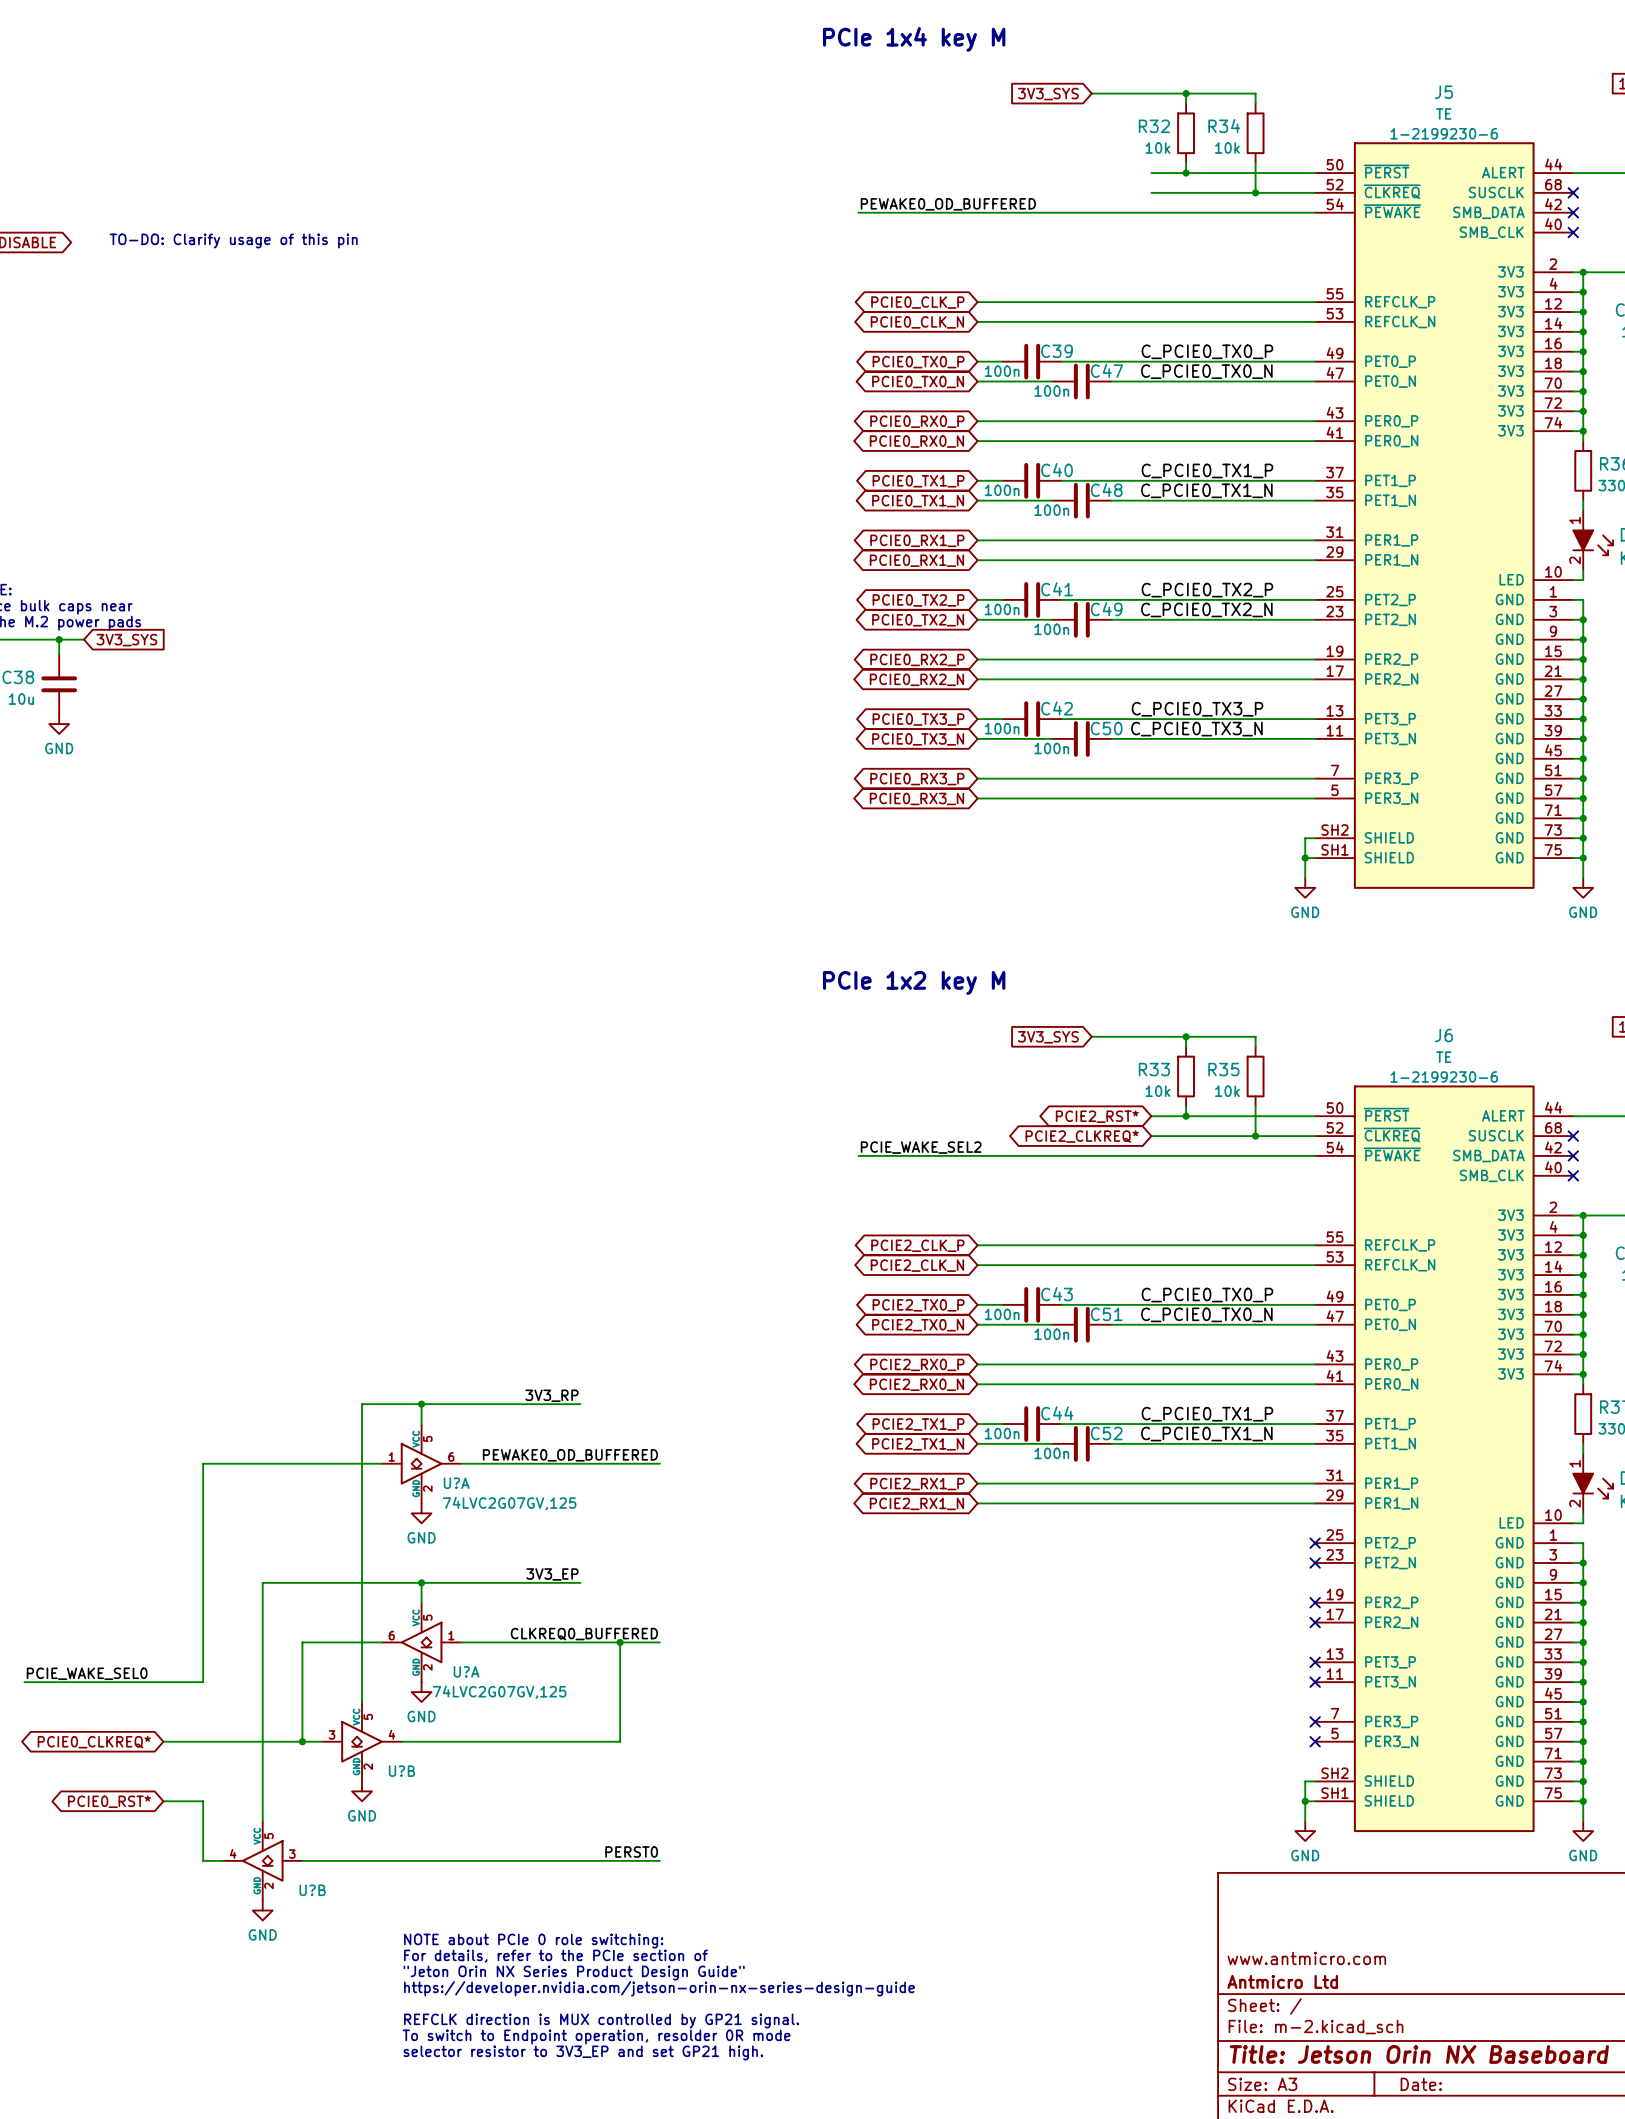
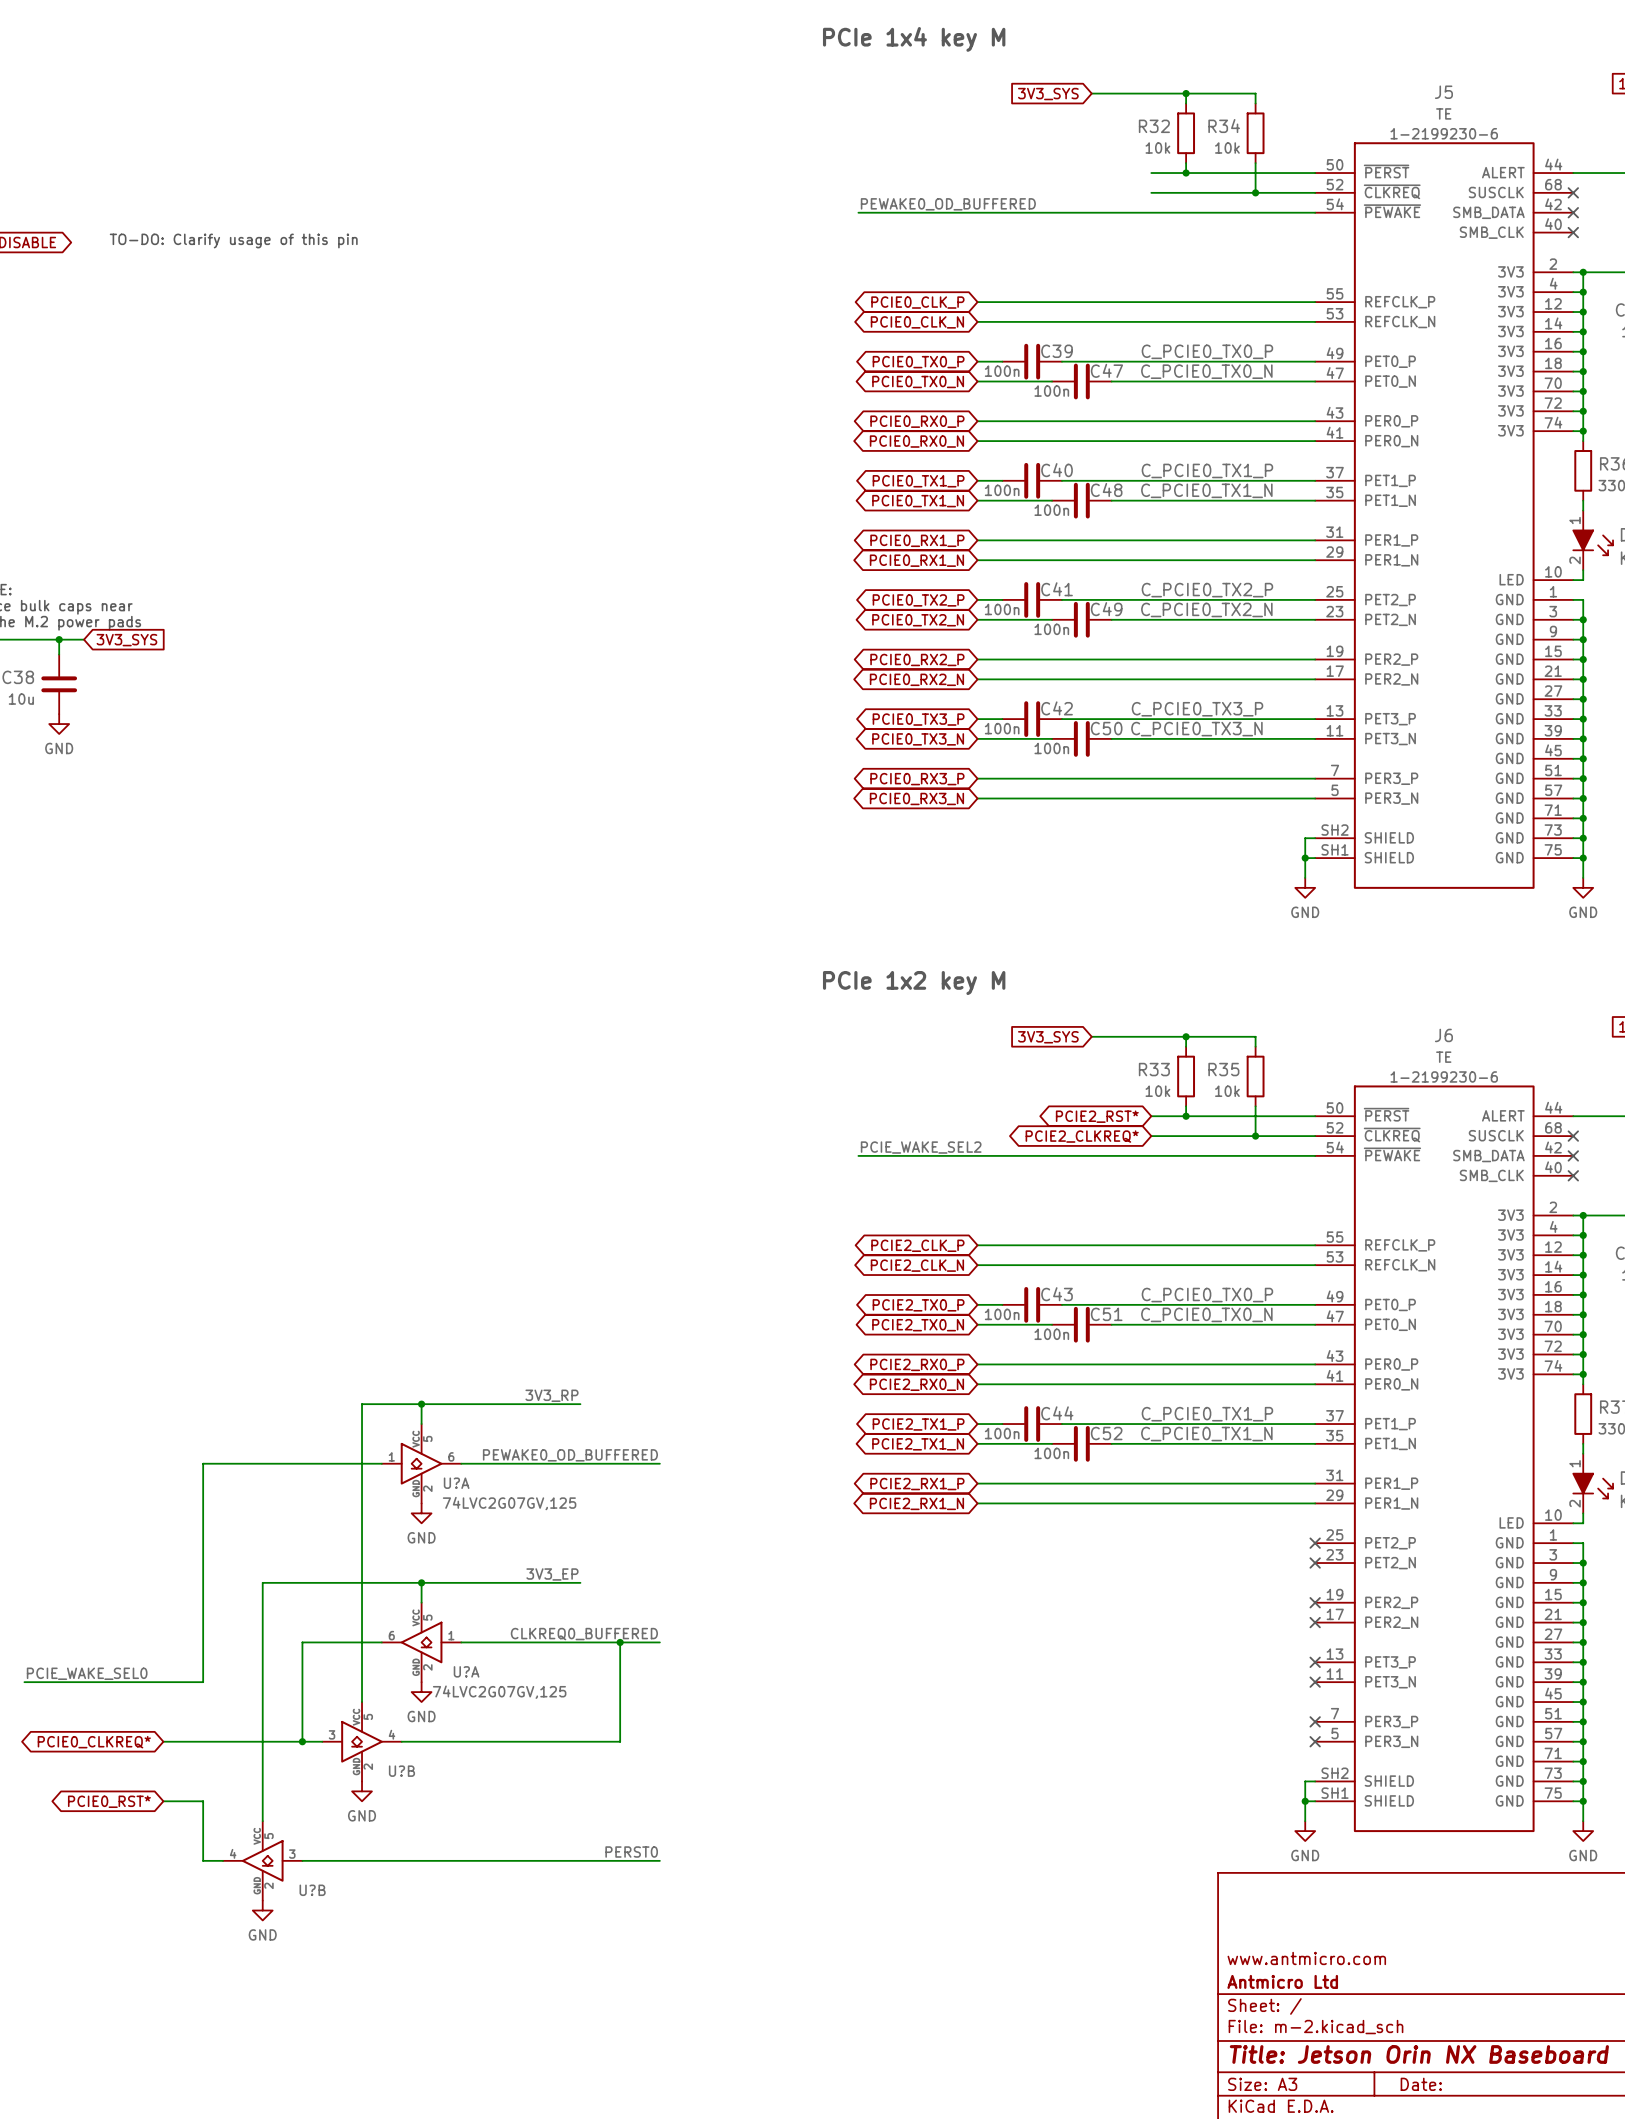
text: NOTE about PCIe 0 role switching: (533, 1941) -> none
text: For details, refer to the PCIe section of (555, 1956) -> none
text: "Jeton Orin NX Series Product Design Guide" (574, 1973) -> none
text: https://developer.nvidia.com/jetson-orin-nx-series-design-guide (659, 1988) -> none
text: REFCLK direction is MUX controlled by GP21 signal. (601, 2021) -> none
text: To switch to Endpoint operation, resolder 0R mode (596, 2036) -> none
text: selector resistor to 3V3_EP and set GP21 high. (583, 2052) -> none

